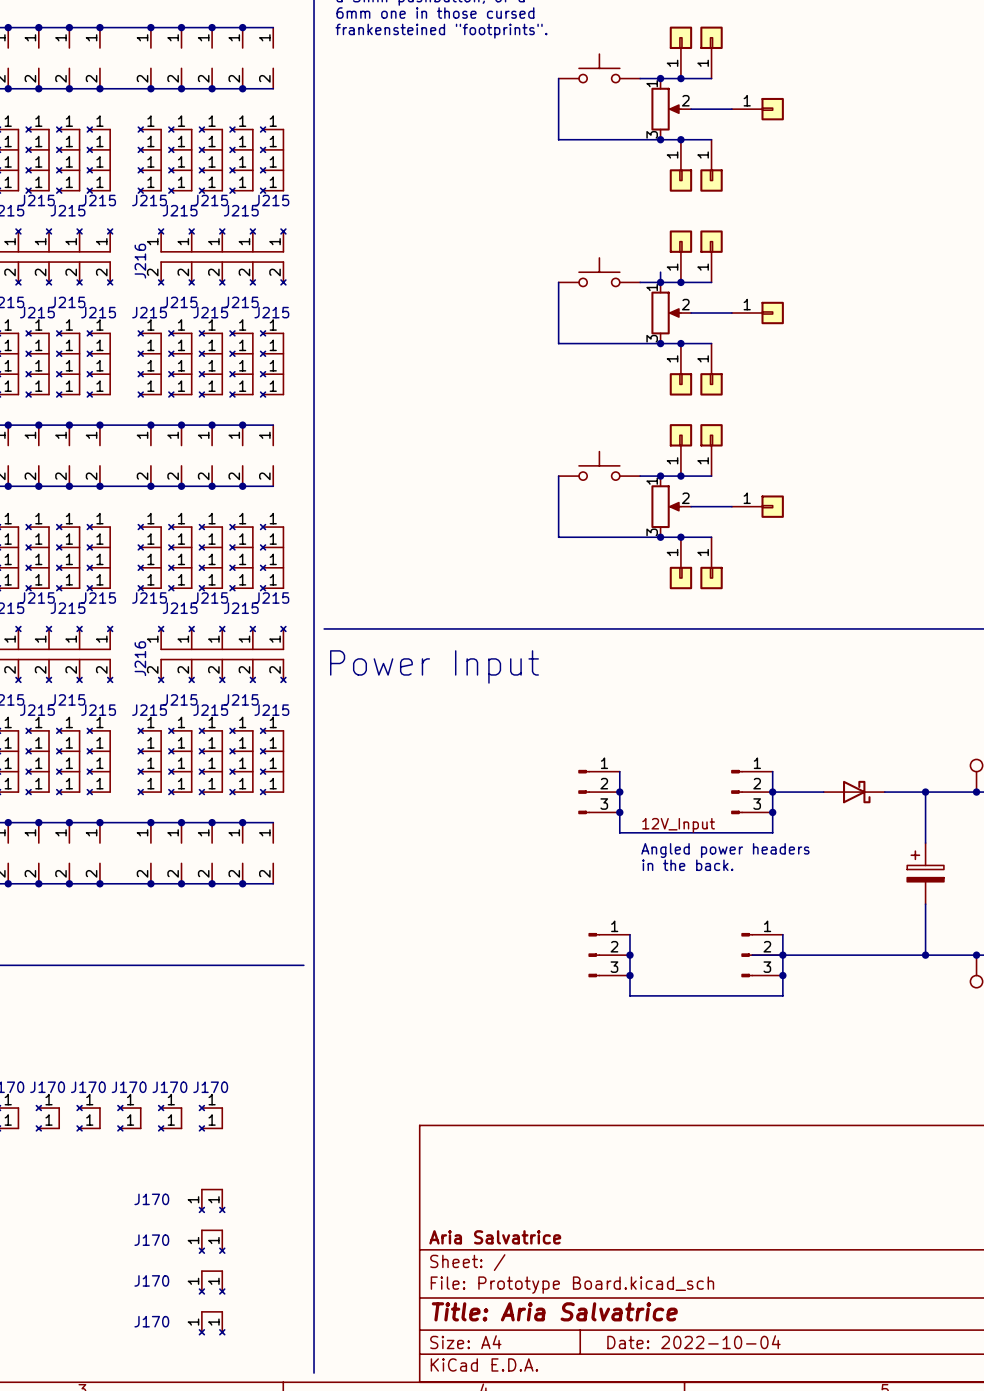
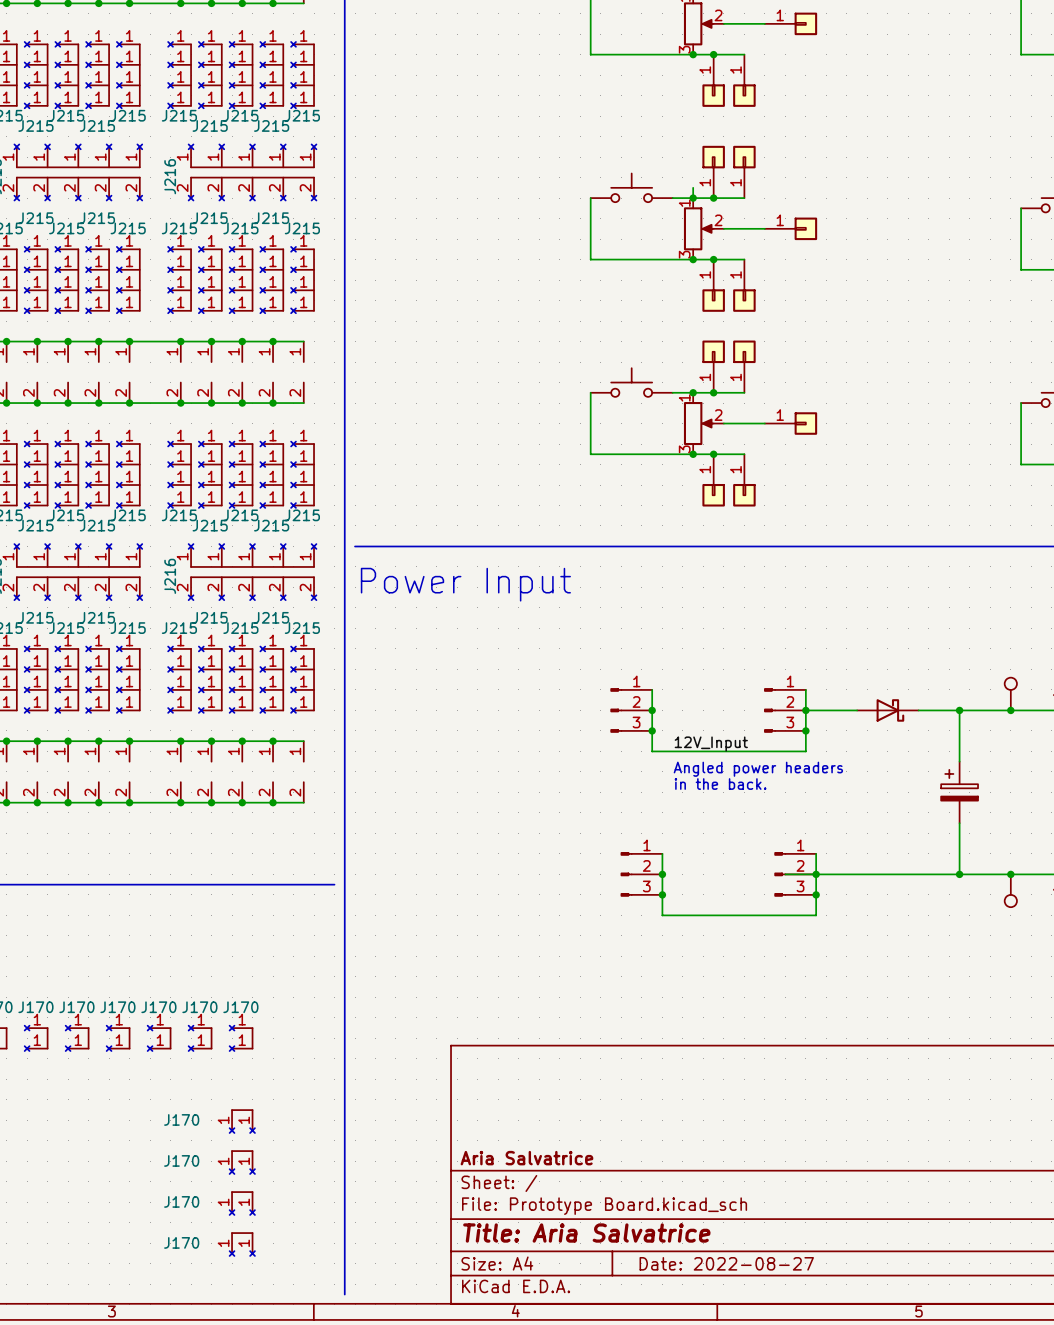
title block: Date: 2022-10-04 (693, 1342) -> Date: 2022-08-27 (726, 1263)

